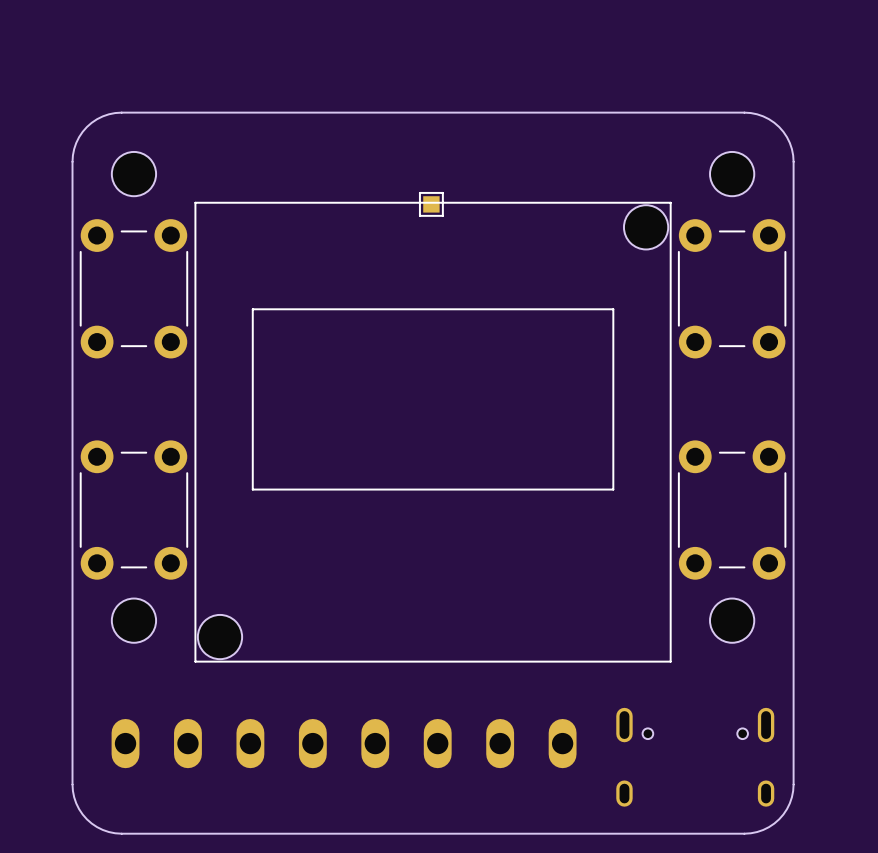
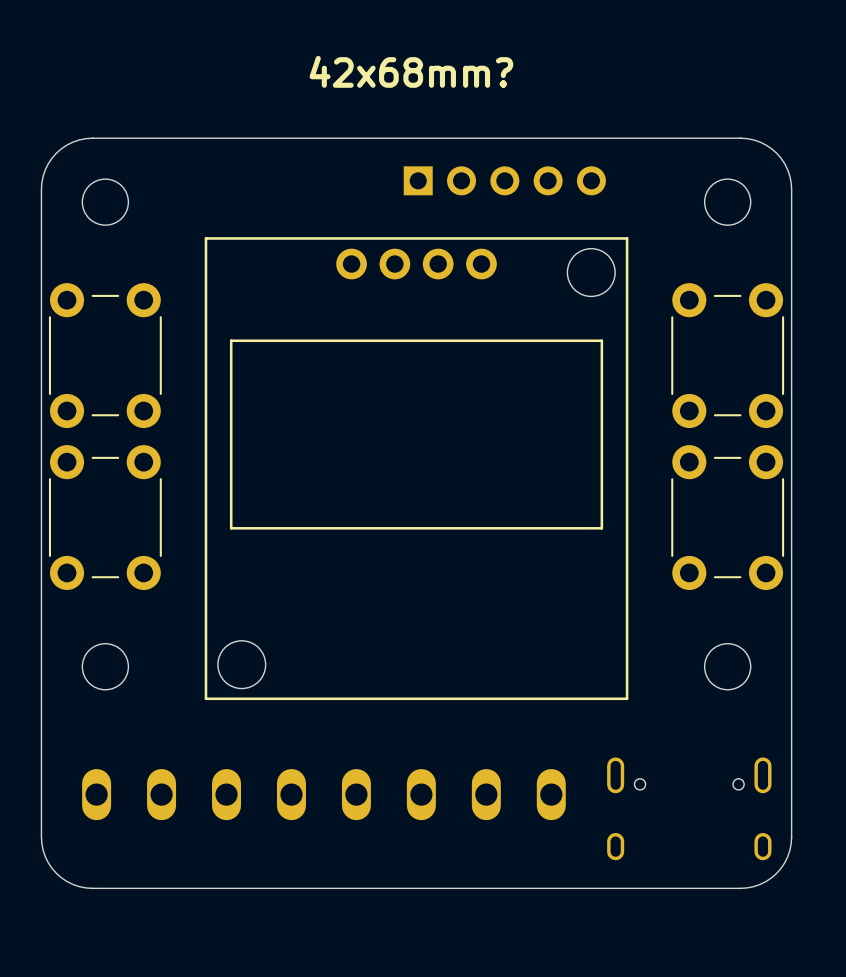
text: none -> 42x68mm? (411, 71)
part: none -> (504, 180)
line: (195, 202) (195, 661) (670, 661) (670, 202) (195, 202) -> none
part: (431, 204) -> none
part: (646, 227) -> none
part position: (133, 288) -> (105, 355)
part position: (732, 288) -> (727, 355)
line: (252, 309) (252, 489) (613, 489) (613, 309) (252, 309) -> none
part: none -> (416, 468)
part position: (133, 510) -> (105, 517)
part position: (732, 510) -> (727, 517)
part: (220, 637) -> none

